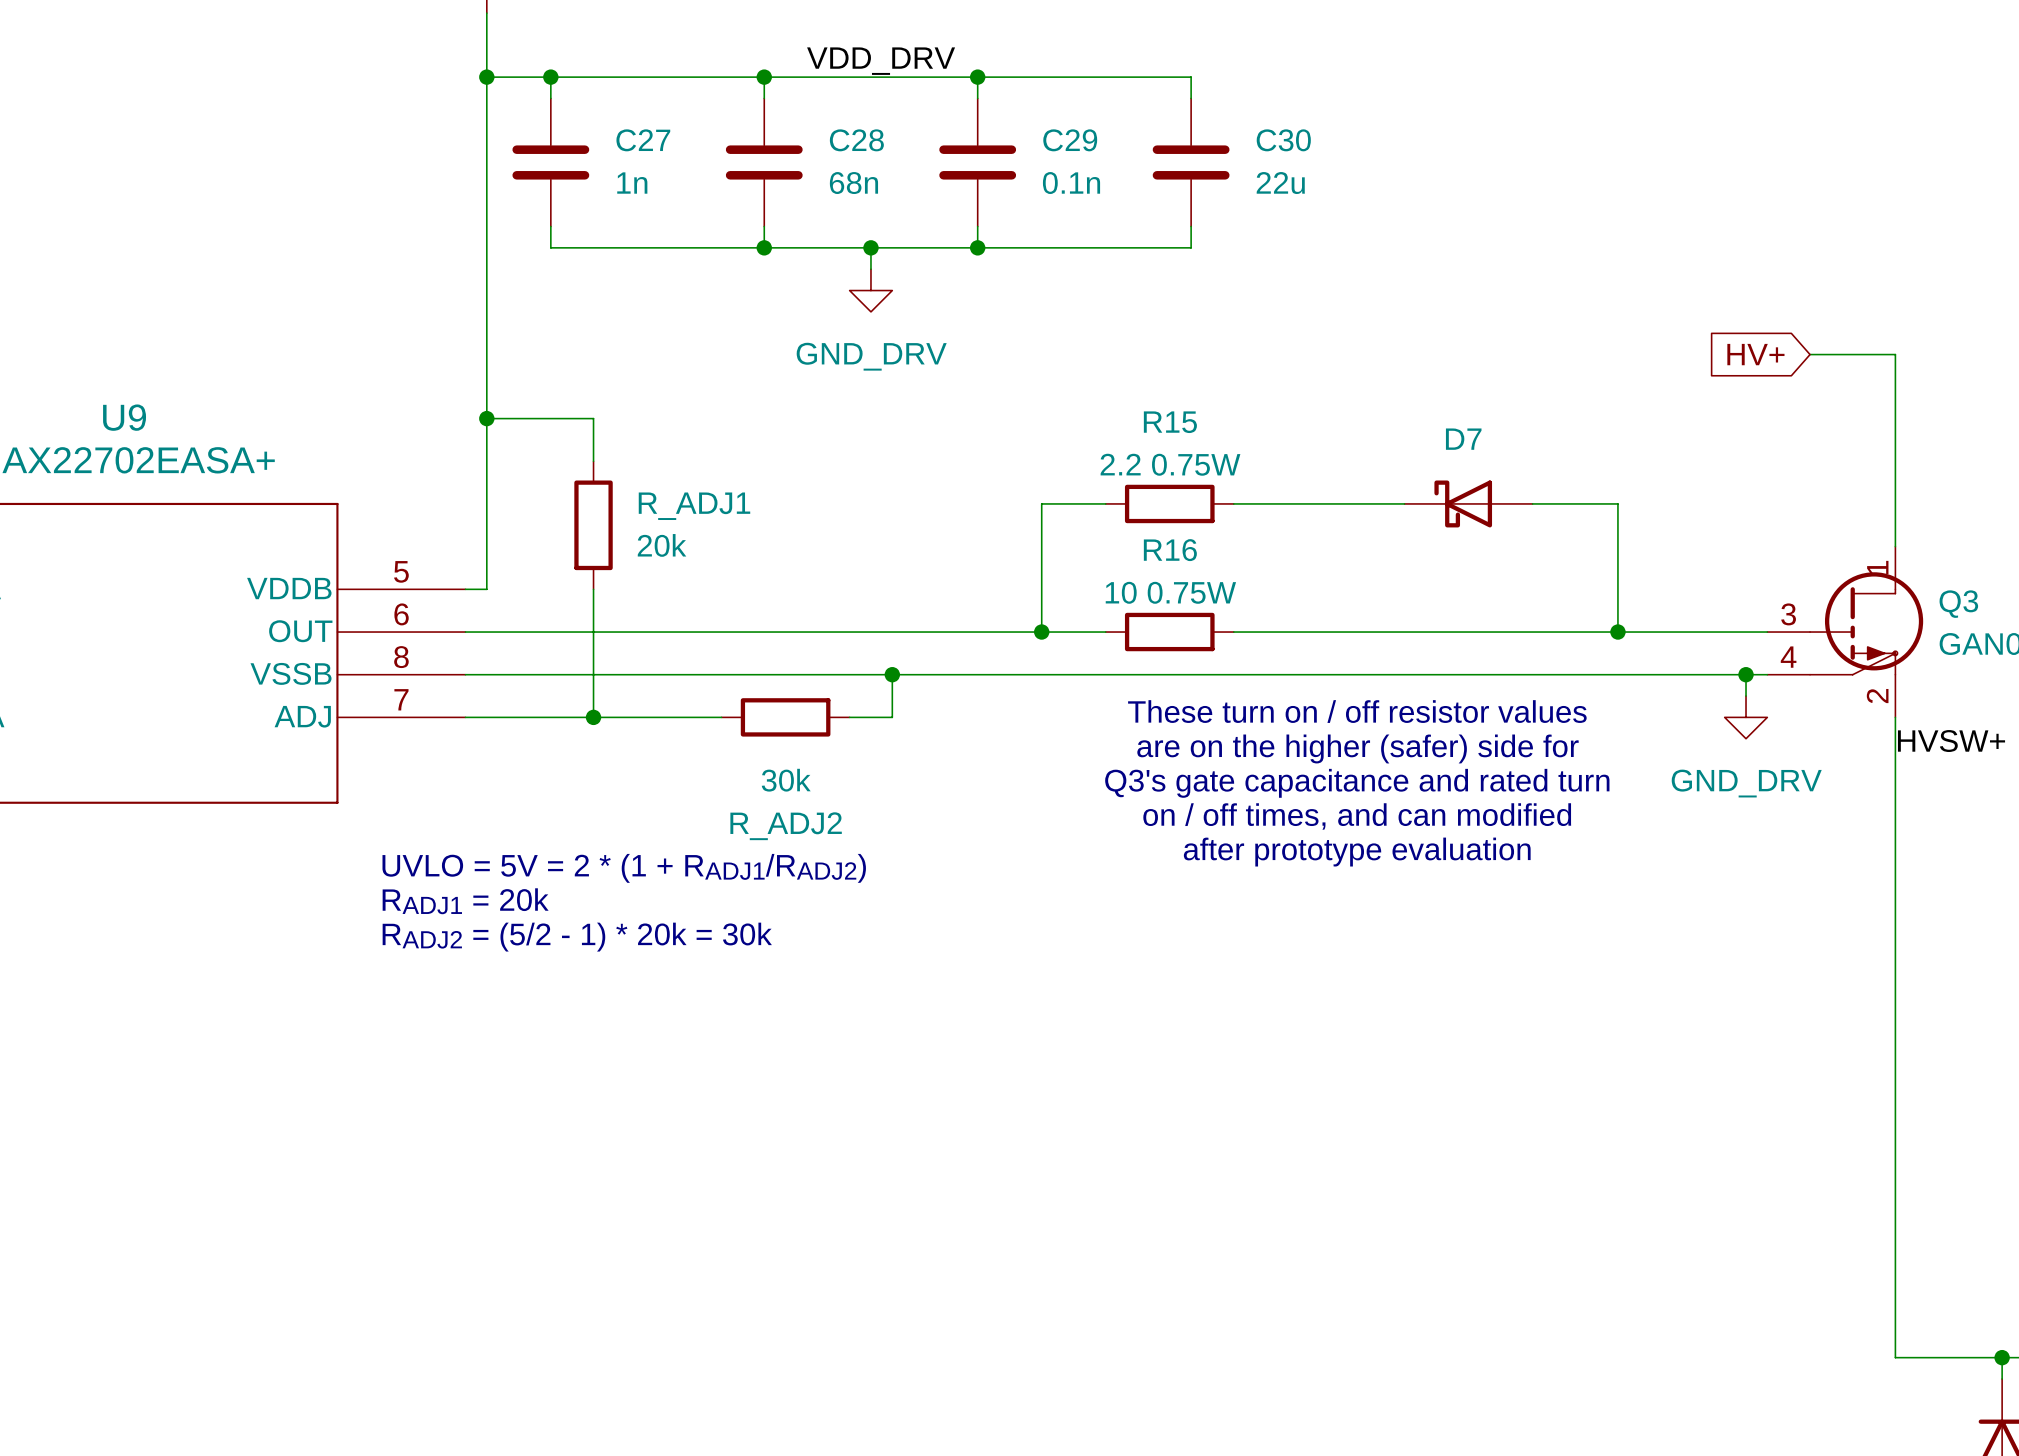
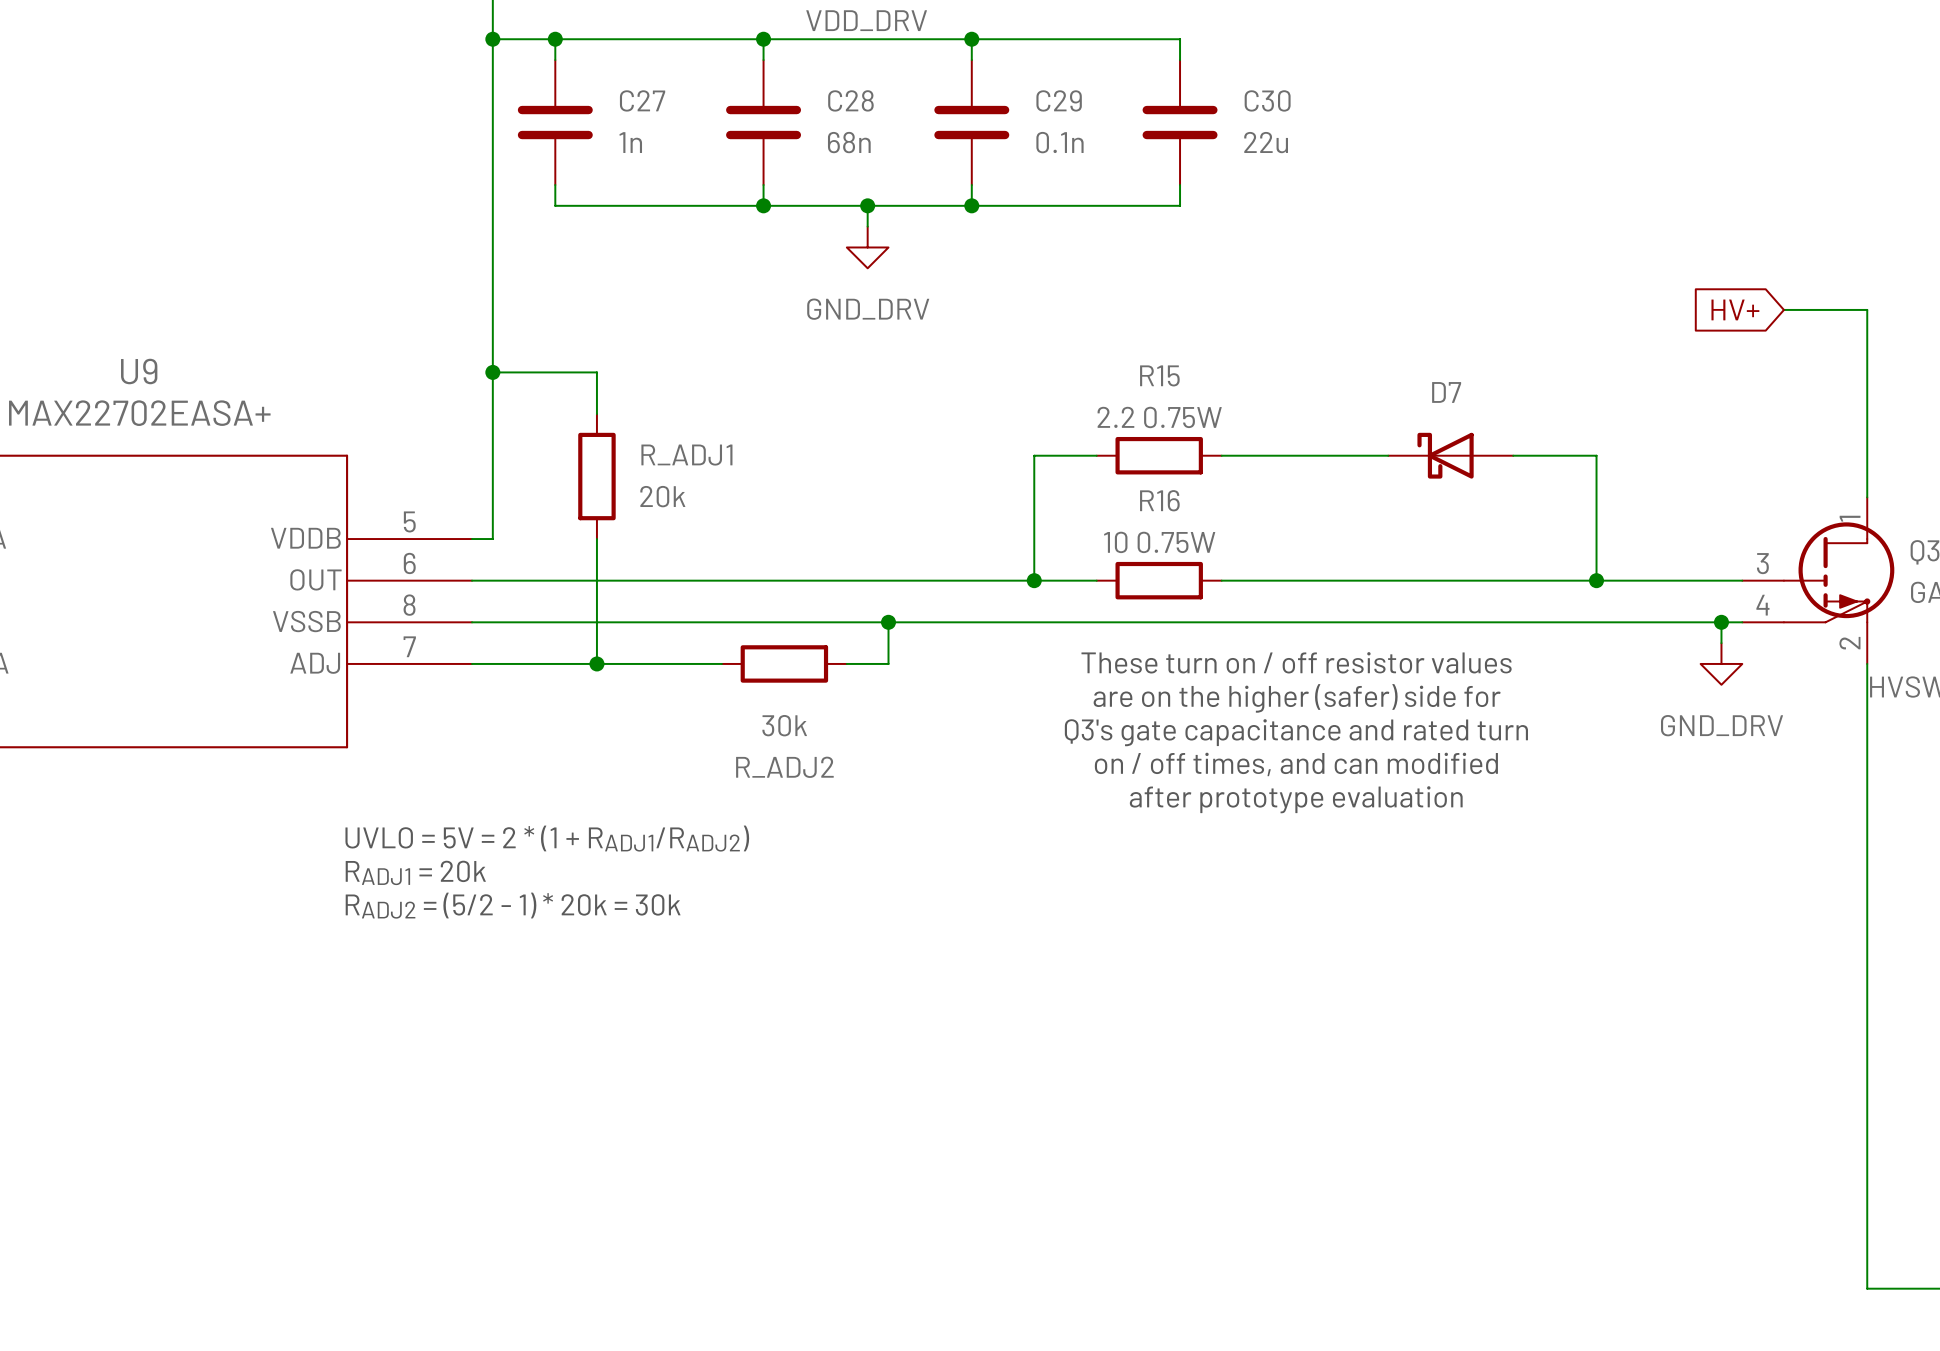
text position: These turn on / off resistor values (1357, 711) -> These turn on / off resistor values (1296, 662)
text position: are on the higher (safer) side for (1357, 748) -> are on the higher (safer) side for (1297, 698)
text position: Q3's gate capacitance and rated turn (1357, 783) -> Q3's gate capacitance and rated turn (1296, 732)
text position: on / off times, and can modified (1357, 816) -> on / off times, and can modified (1296, 764)
text position: after prototype evaluation (1357, 852) -> after prototype evaluation (1296, 799)
text position: UVLO = 5V = 2 * (1 + RADJ1/RADJ2) (624, 868) -> UVLO = 5V = 2 * (1 + RADJ1/RADJ2) (547, 838)
text position: RADJ1 = 20k (465, 901) -> RADJ1 = 20k (415, 872)
text position: RADJ2 = (5/2 - 1) * 20k = 30k (577, 937) -> RADJ2 = (5/2 - 1) * 20k = 30k (513, 905)

